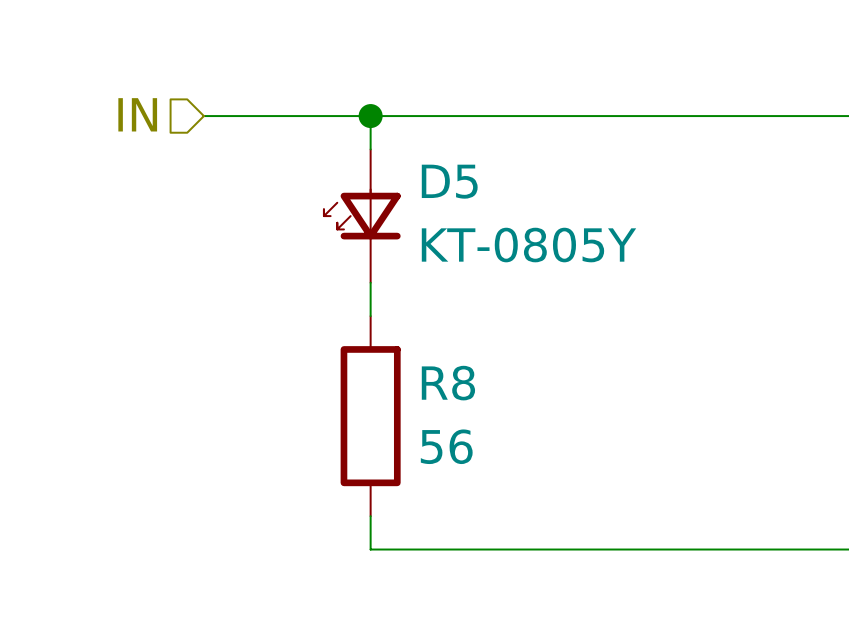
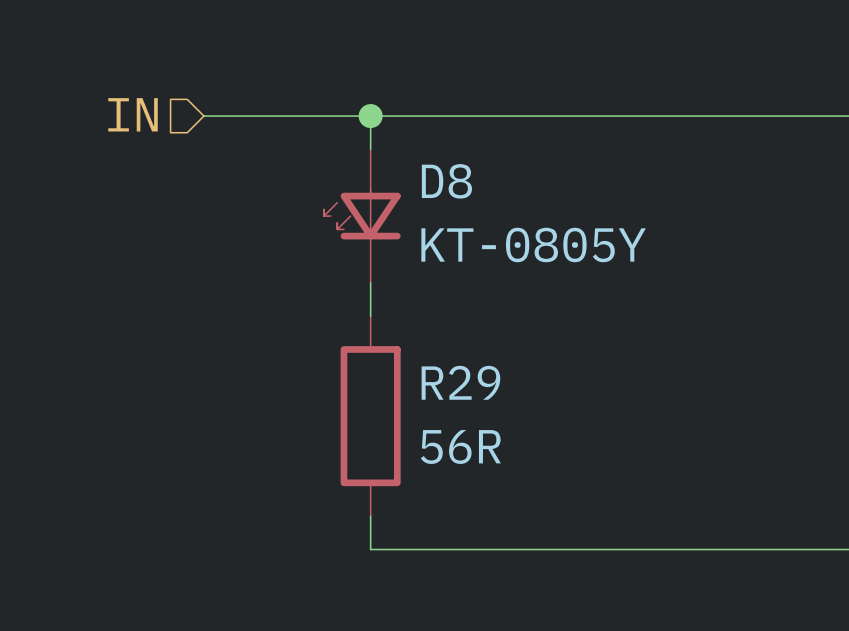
D5 name: D5 (449, 181) -> D8 (446, 181)
R8 name: R8 (448, 383) -> R29 (460, 382)
R8 value: 56 (446, 446) -> 56R (460, 447)

